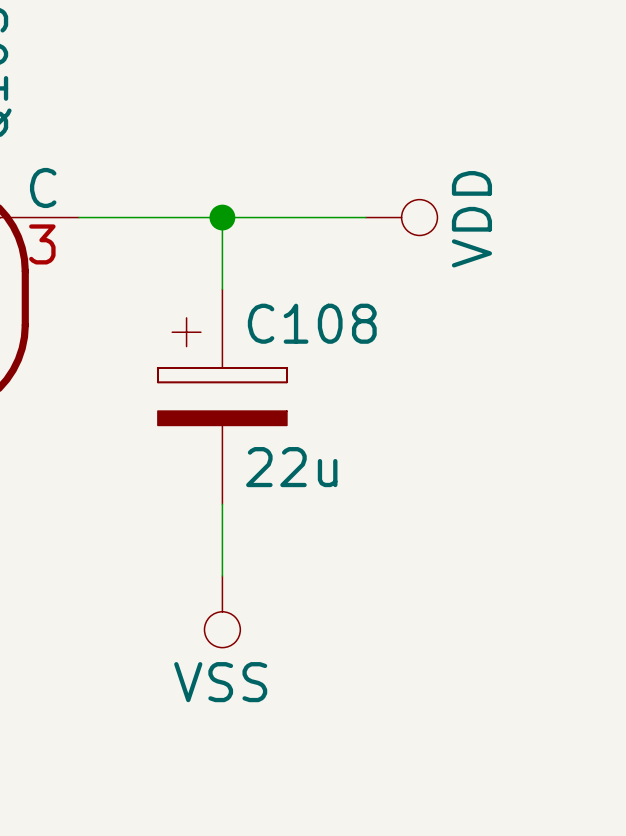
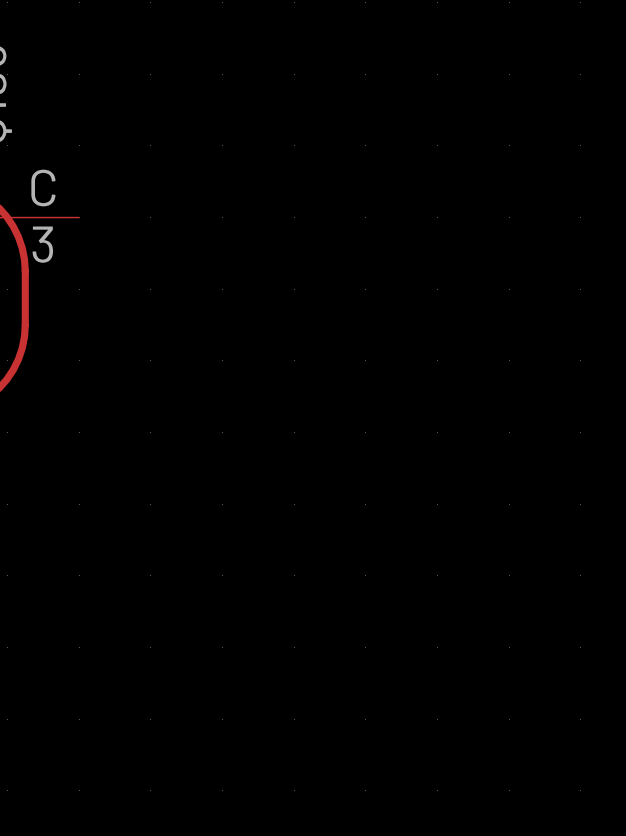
wire: (79, 217) (365, 217) -> none
wire: (222, 217) (222, 289) -> none
junction: (222, 217) -> none
power symbol: VDD (401, 217) -> none
C108: 22u (222, 396) -> none
wire: (222, 504) (222, 575) -> none
power symbol: VSS (222, 611) -> none

